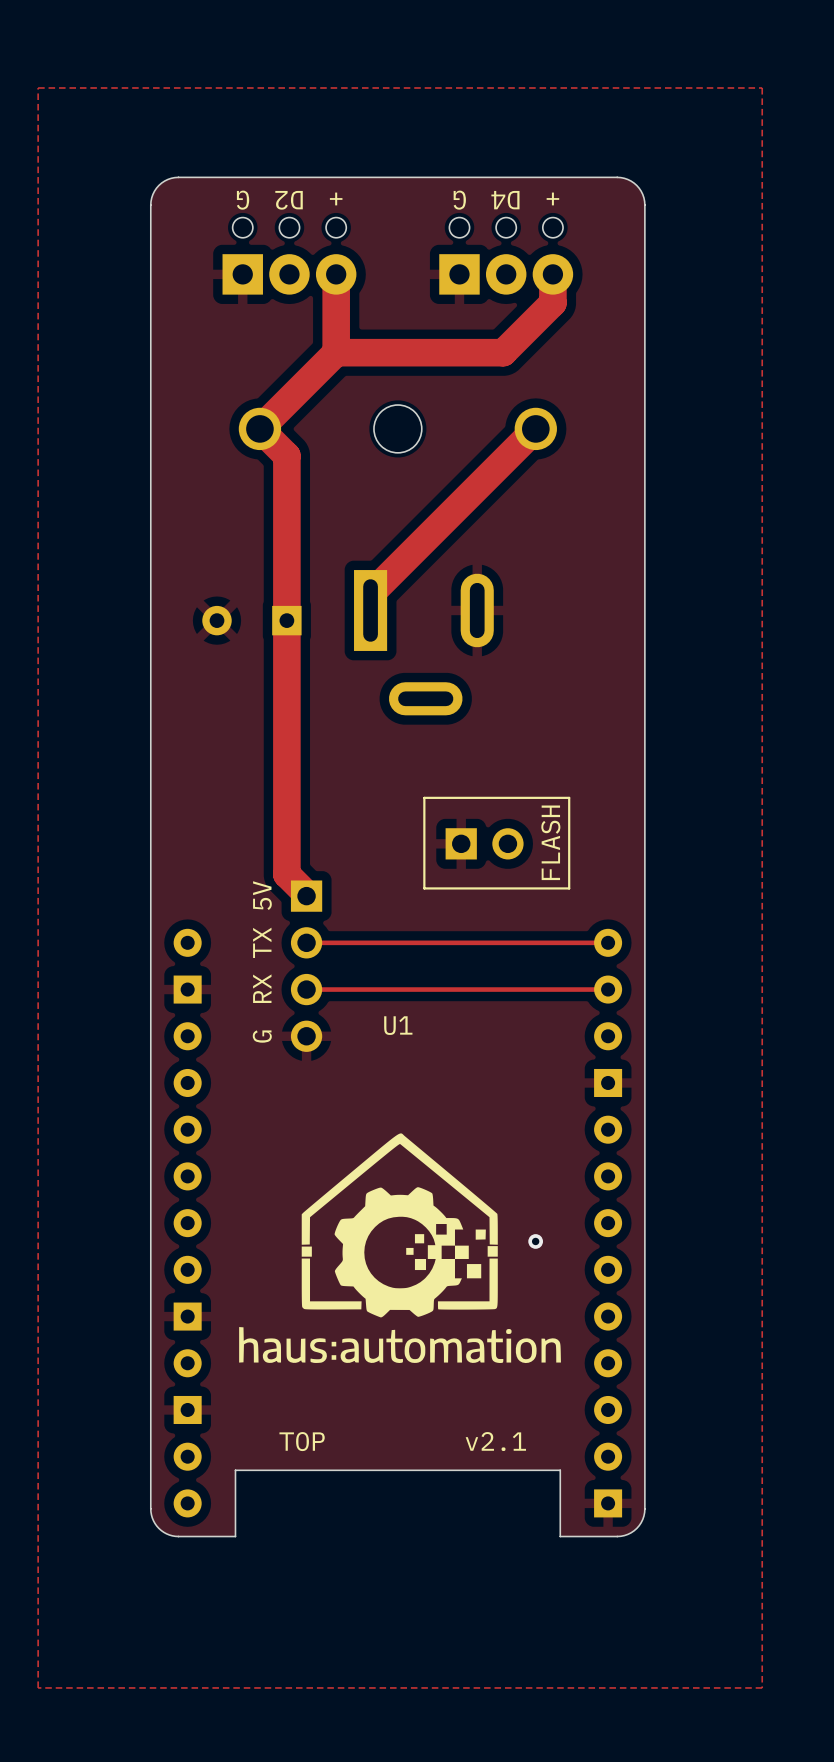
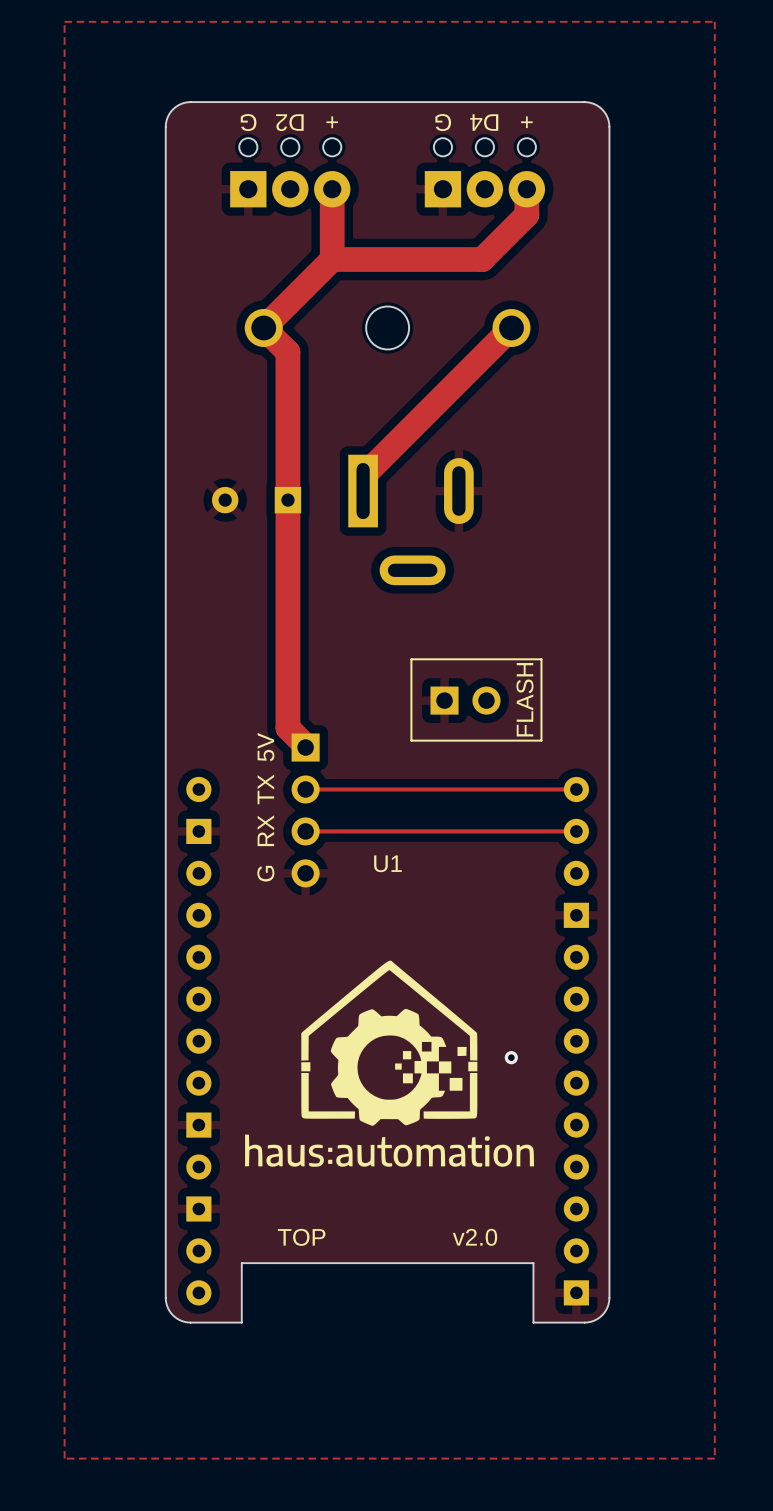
text: v2.1 (495, 1441) -> v2.0 (474, 1237)

